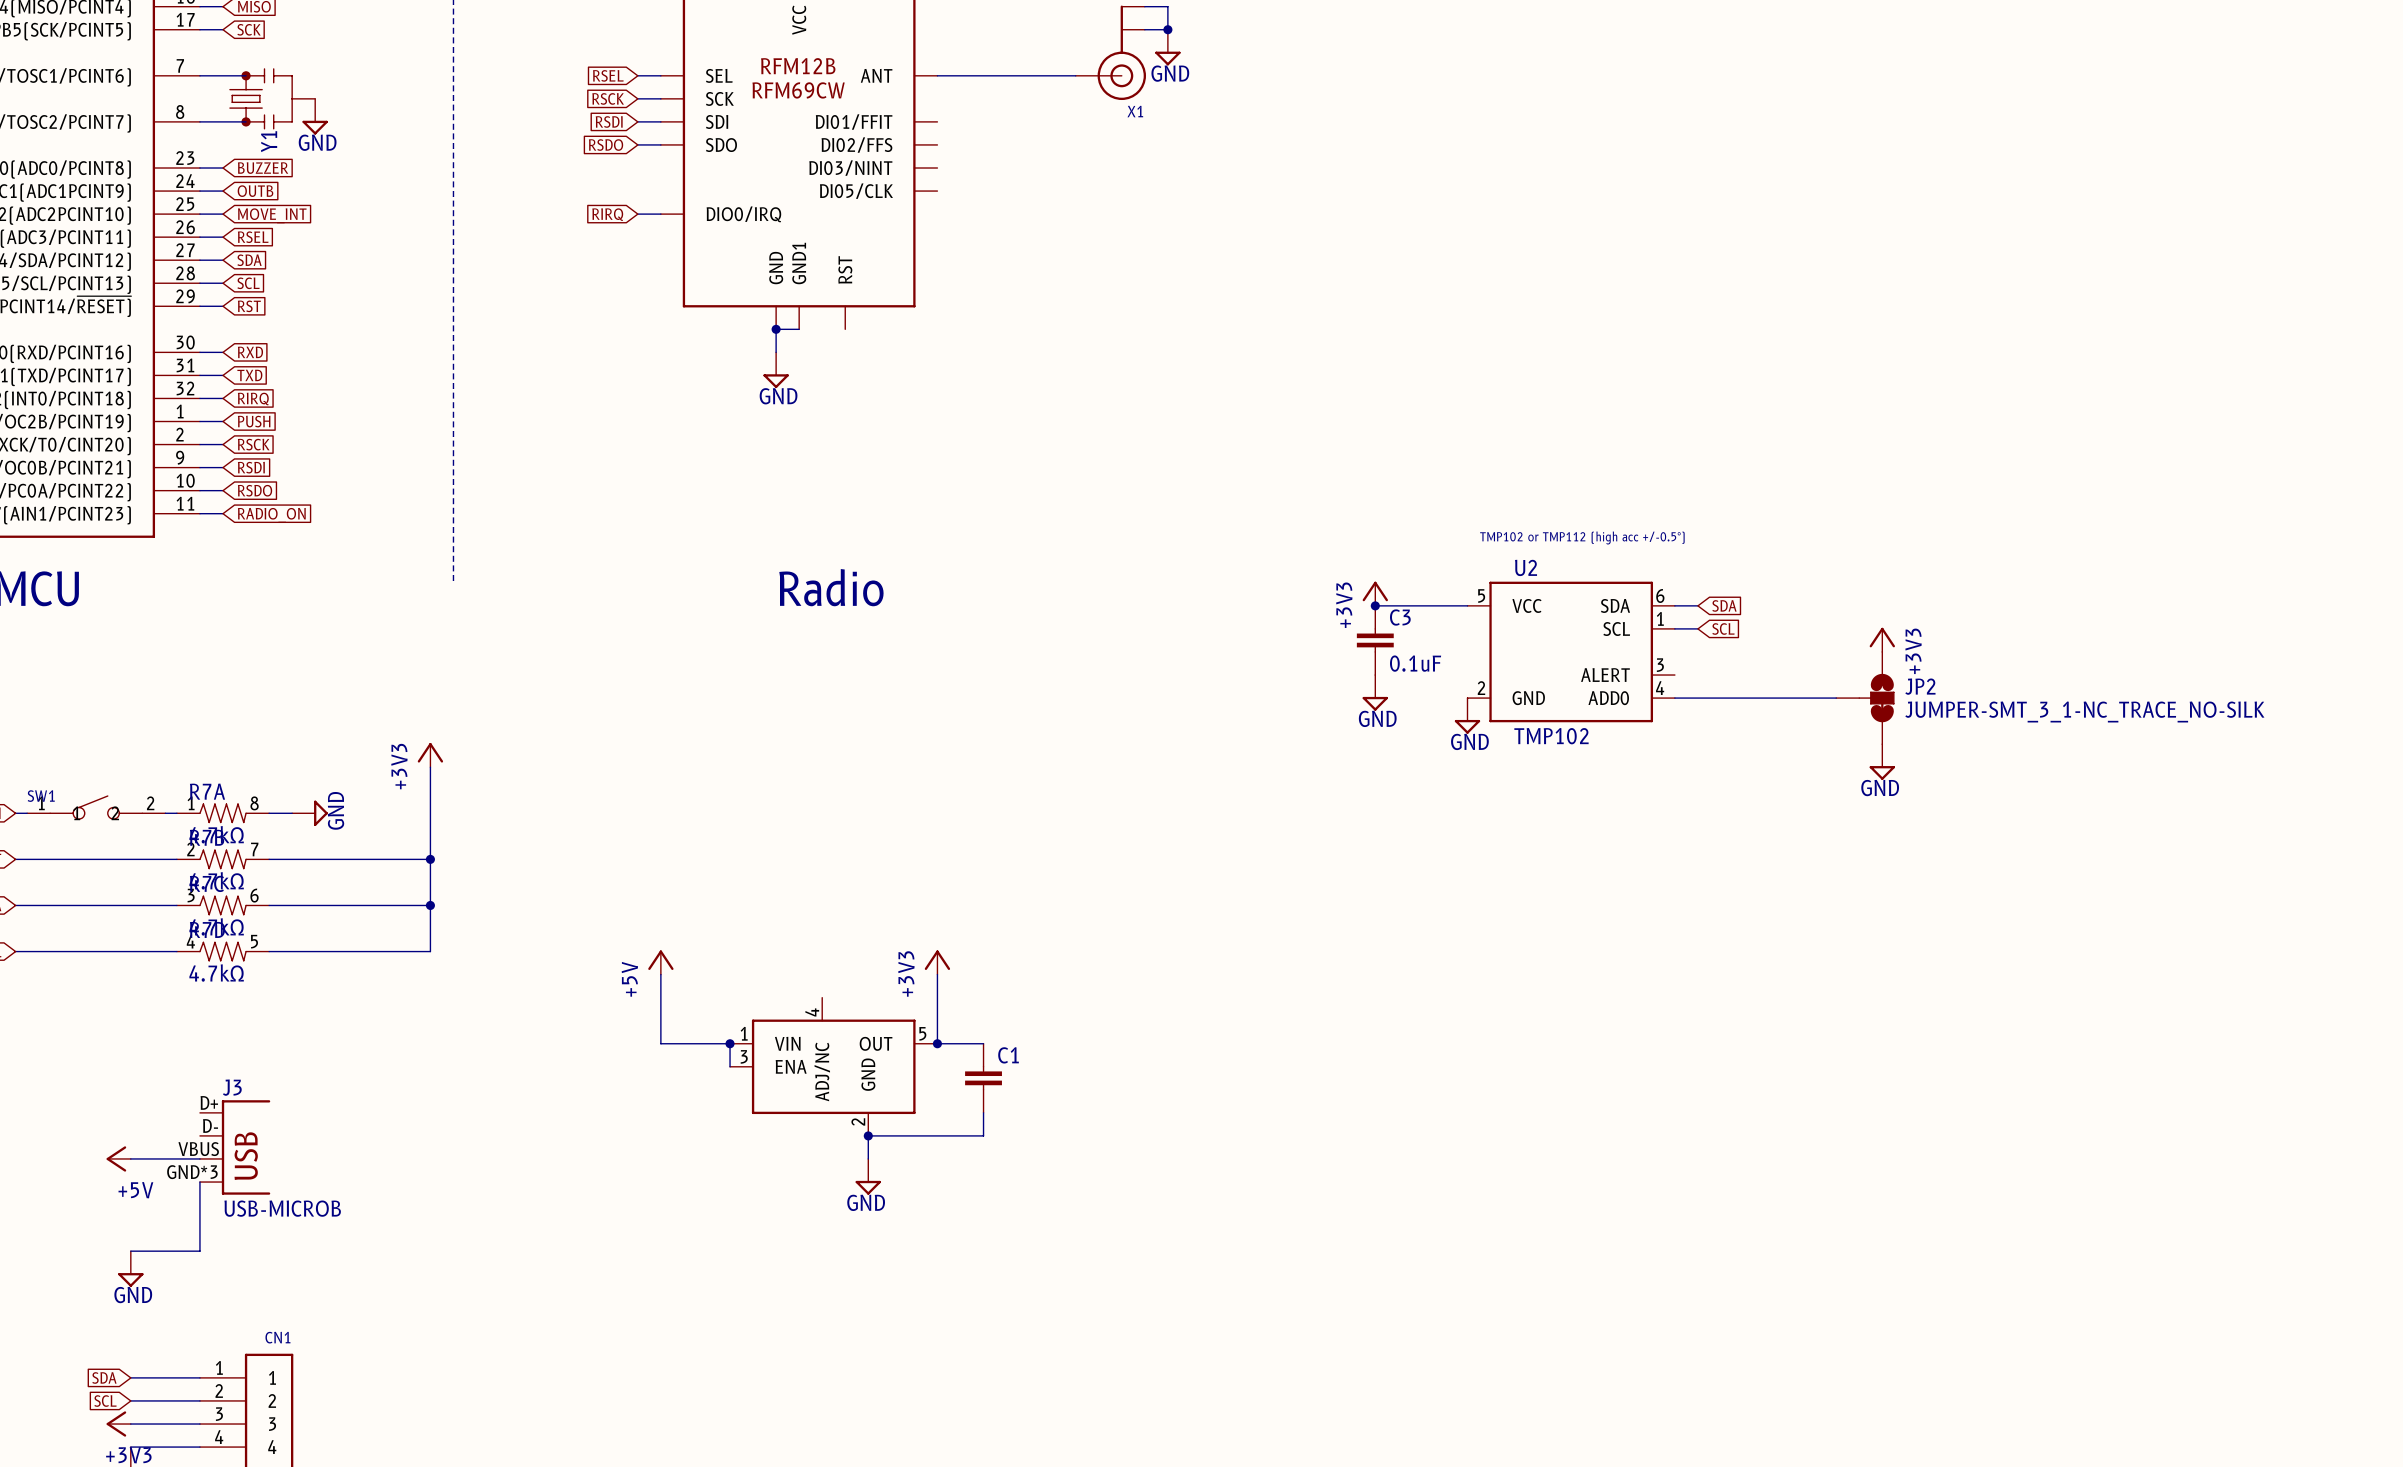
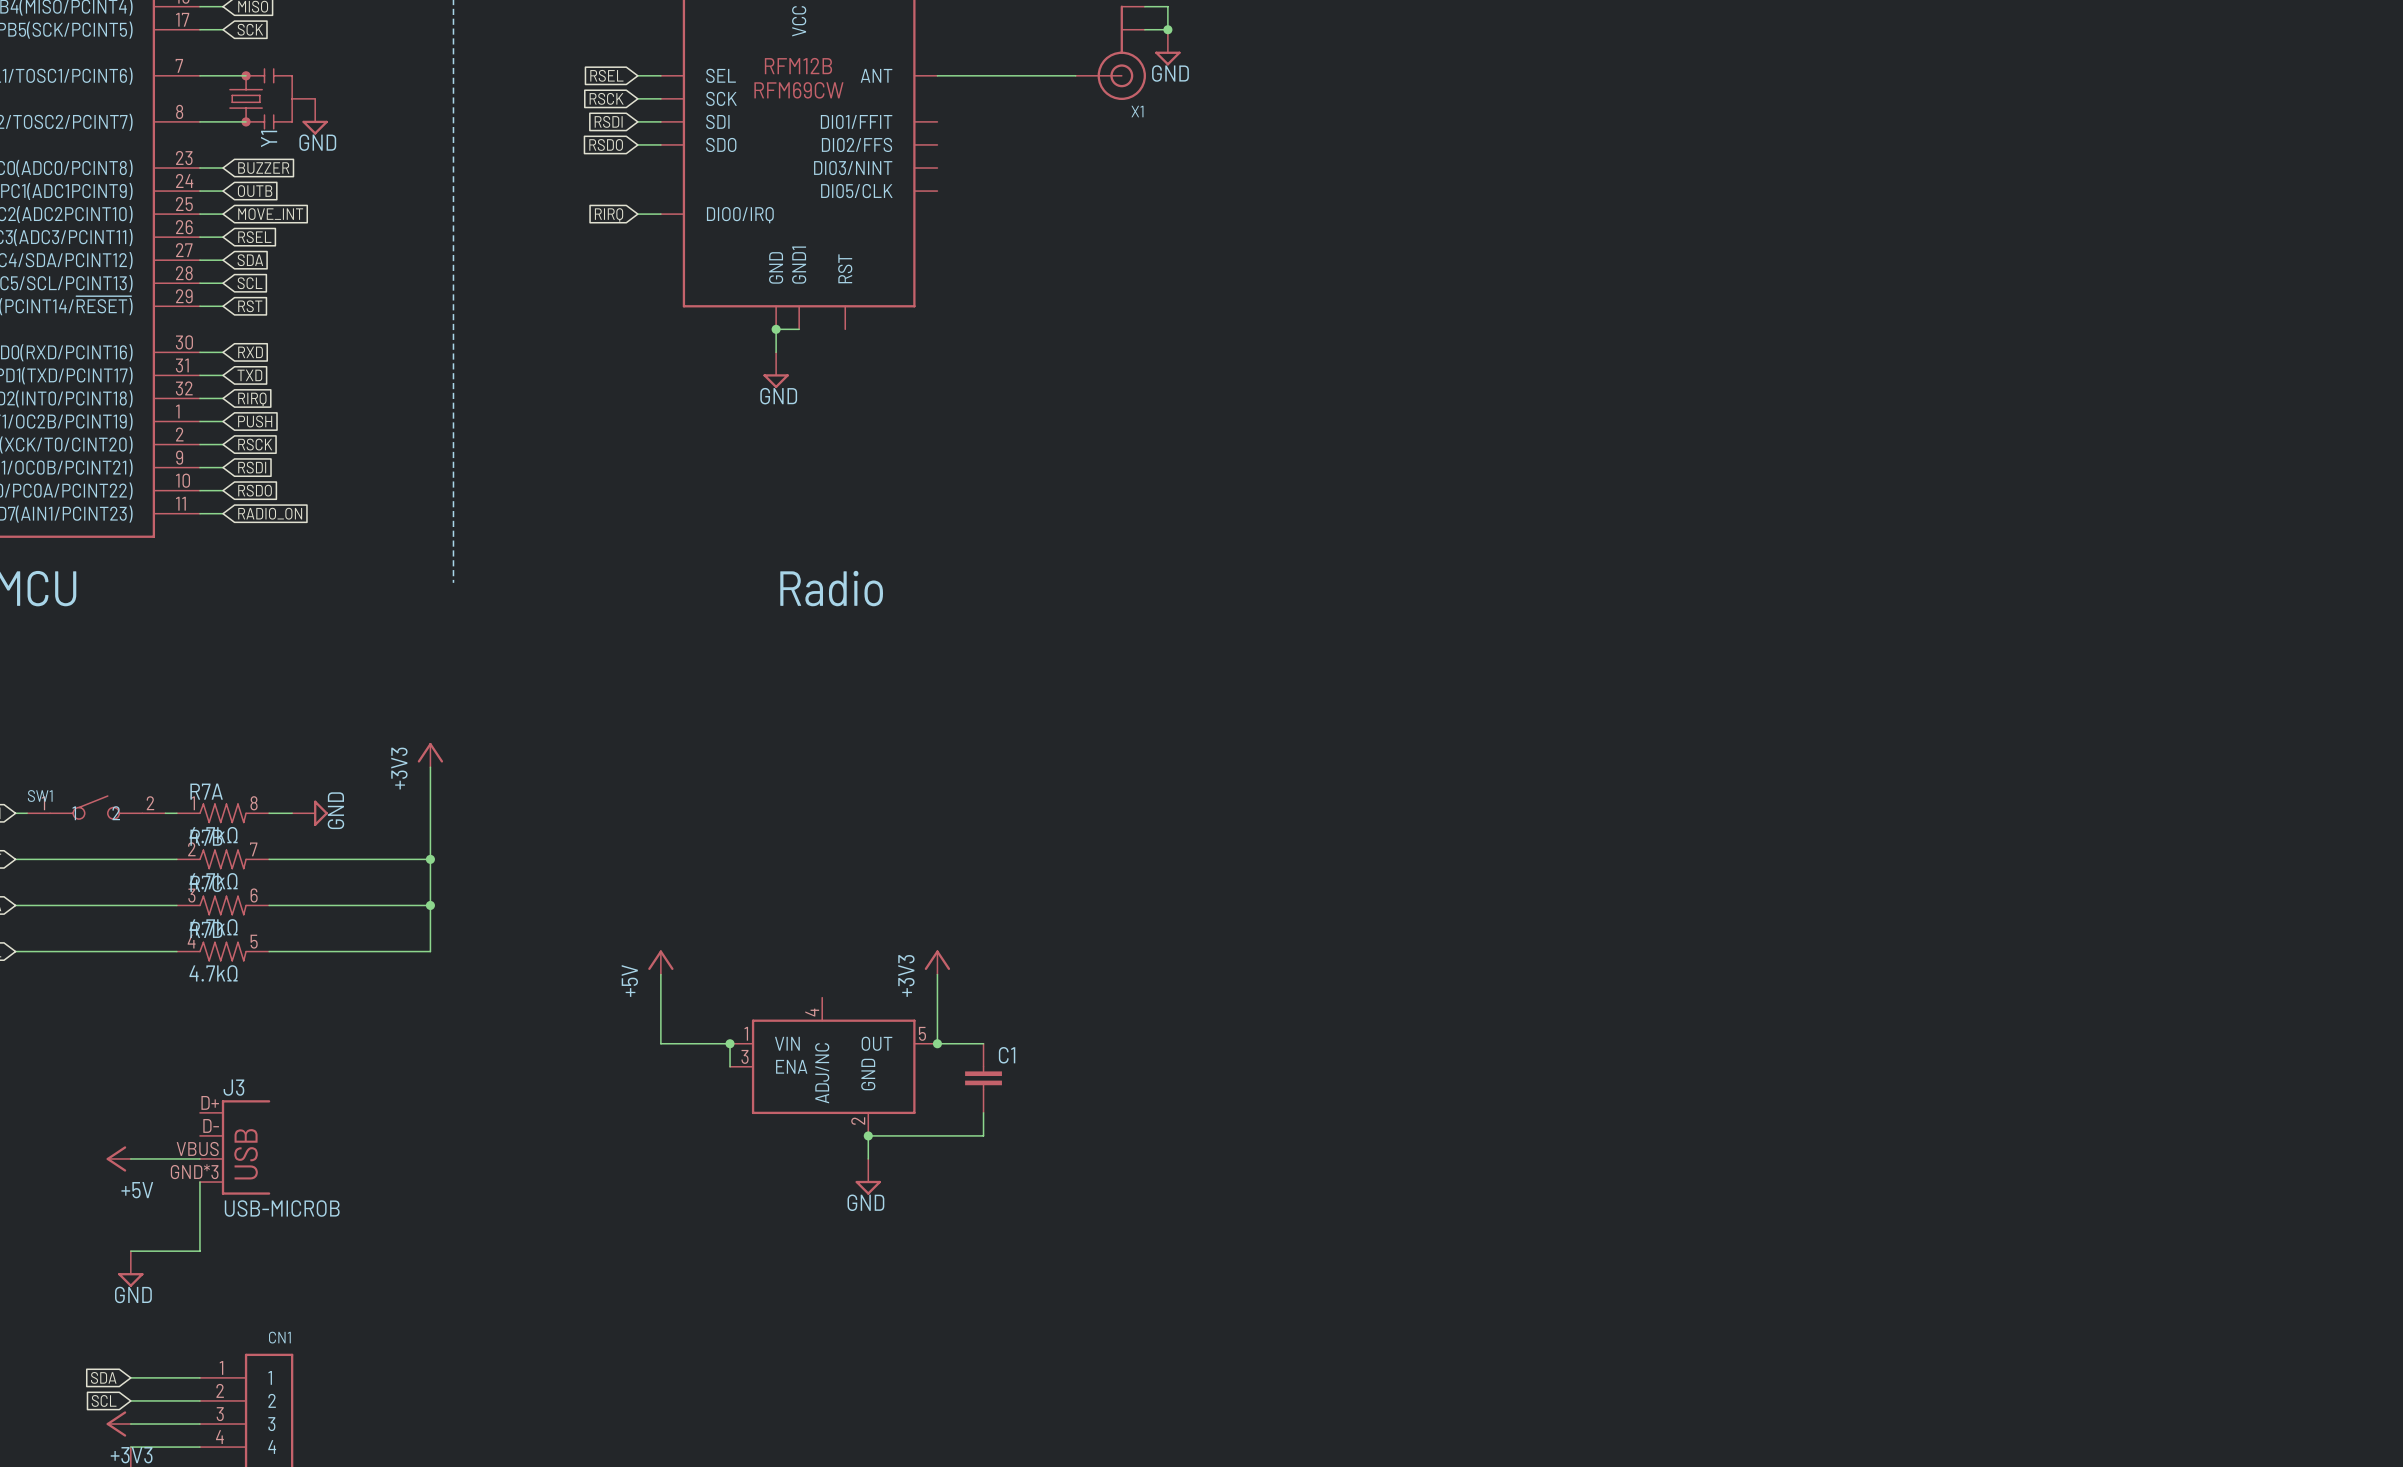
text: TMP102 or TMP112 (high acc +/-0.5°) (1582, 538) -> none
power symbol: +3V3 (1375, 593) -> none
wire: (1375, 605) (1467, 605) -> none
junction: (1375, 605) -> none
wire: (1674, 605) (1697, 605) -> none
global label: SDA (1724, 605) -> none
wire: (1674, 628) (1697, 628) -> none
global label: SCL (1723, 628) -> none
power symbol: +3V3 (1882, 639) -> none
C3: 0.1uF (1375, 640) -> none
U2: TMP102 (1571, 651) -> none
power symbol: GND (1375, 692) -> none
wire: (1674, 698) (1836, 698) -> none
JP2: JUMPER-SMT_3_1-NC_TRACE_NO-SILK (1865, 698) -> none
power symbol: GND (1467, 715) -> none
power symbol: GND (1882, 762) -> none

